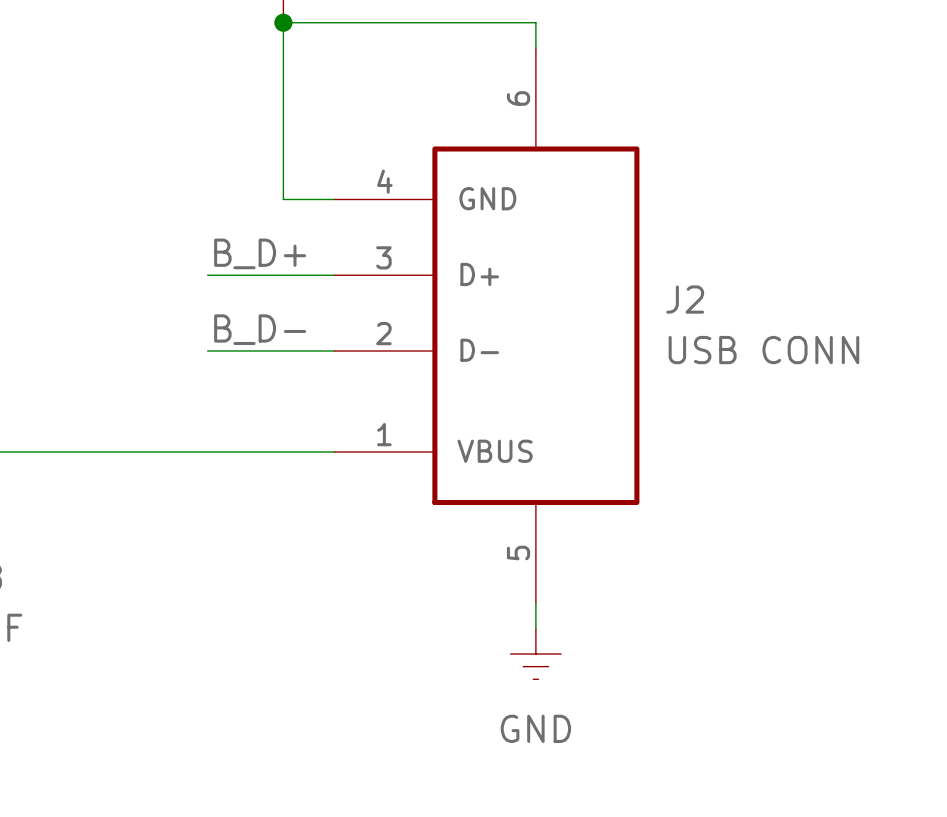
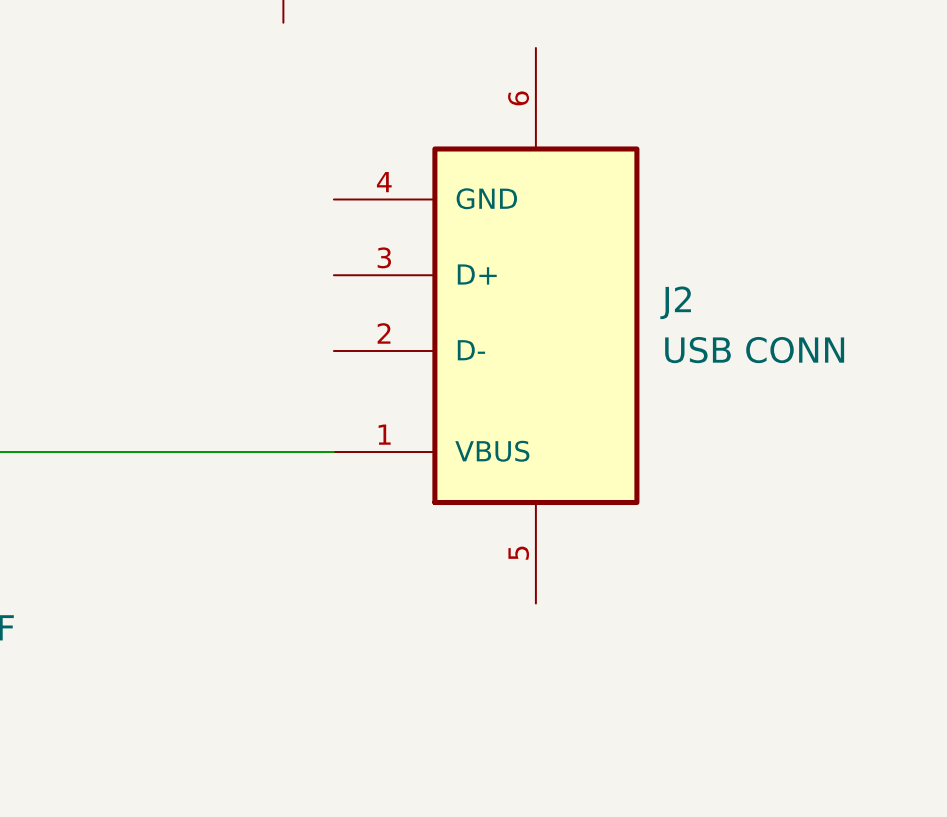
junction: (283, 22) -> none
wire: (535, 47) (535, 22) (283, 22) (283, 199) (333, 199) -> none
label: B_D+ (260, 253) -> none
wire: (207, 275) (333, 275) -> none
label: B_D- (260, 329) -> none
wire: (207, 351) (333, 351) -> none
wire: (535, 603) (535, 628) -> none
power symbol: GND (535, 654) -> none

